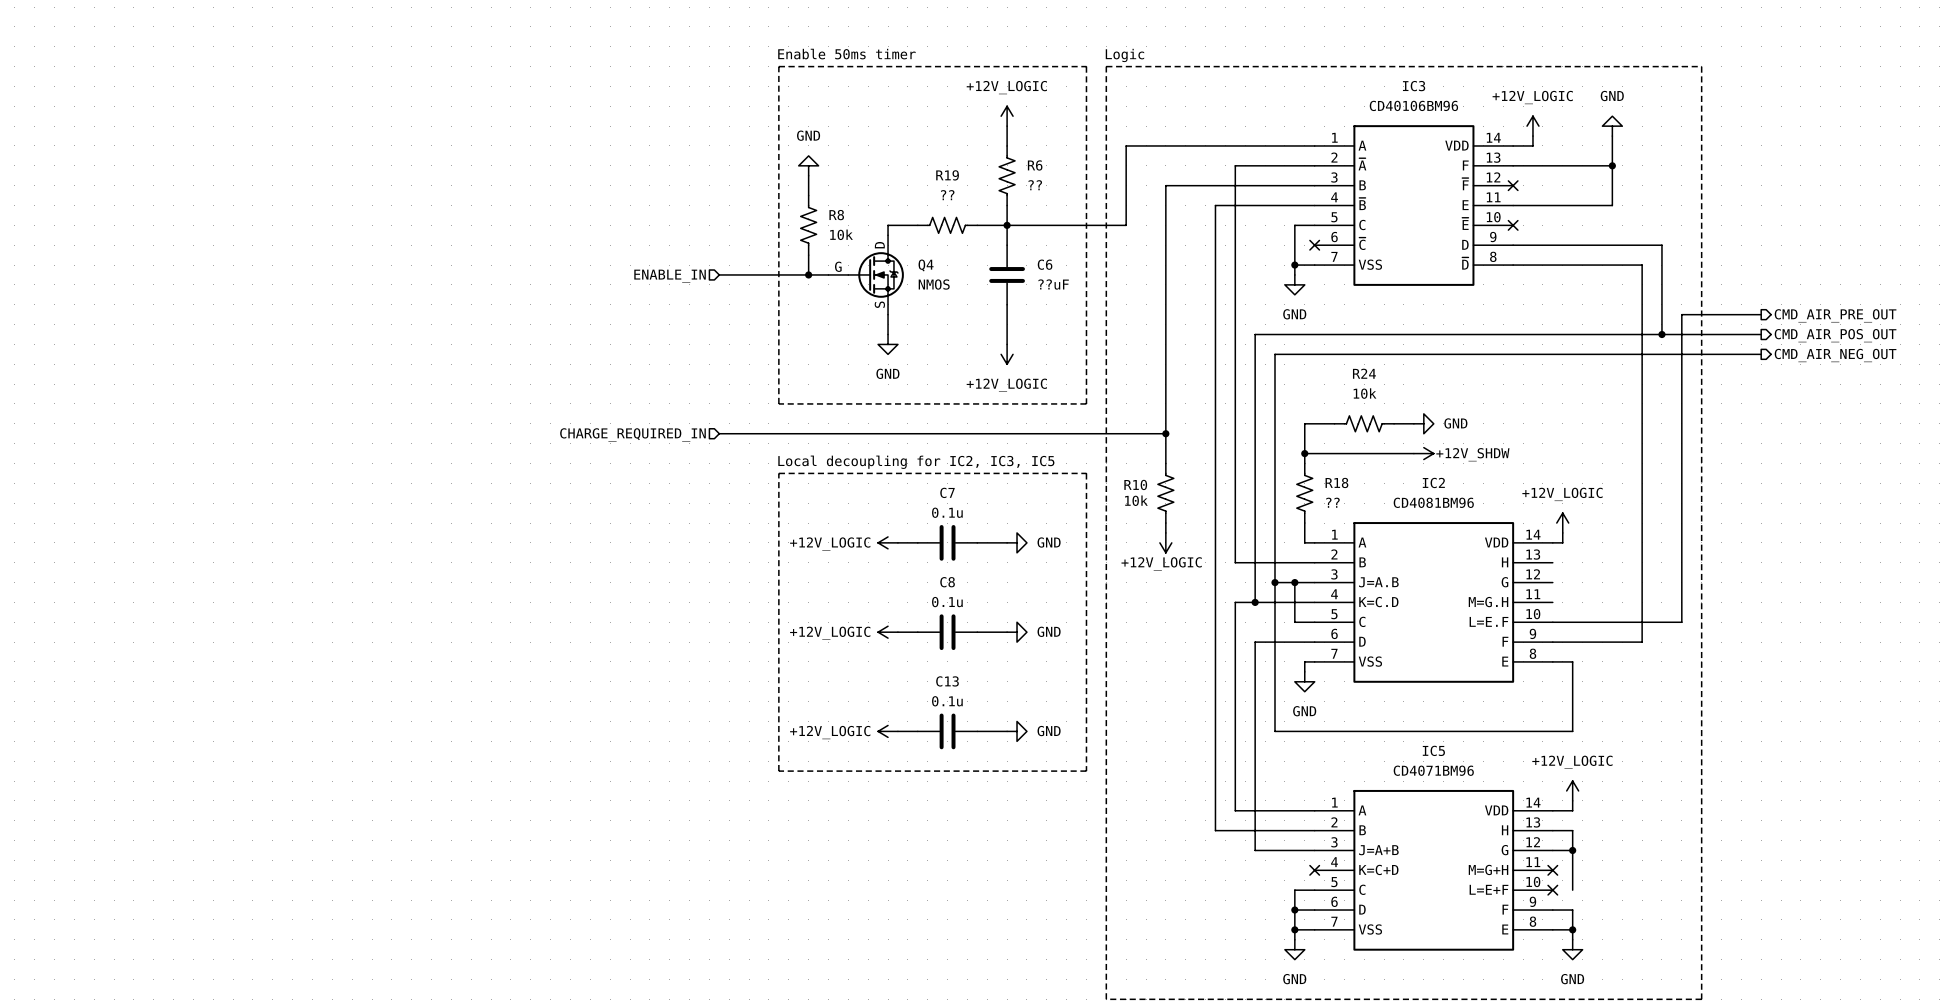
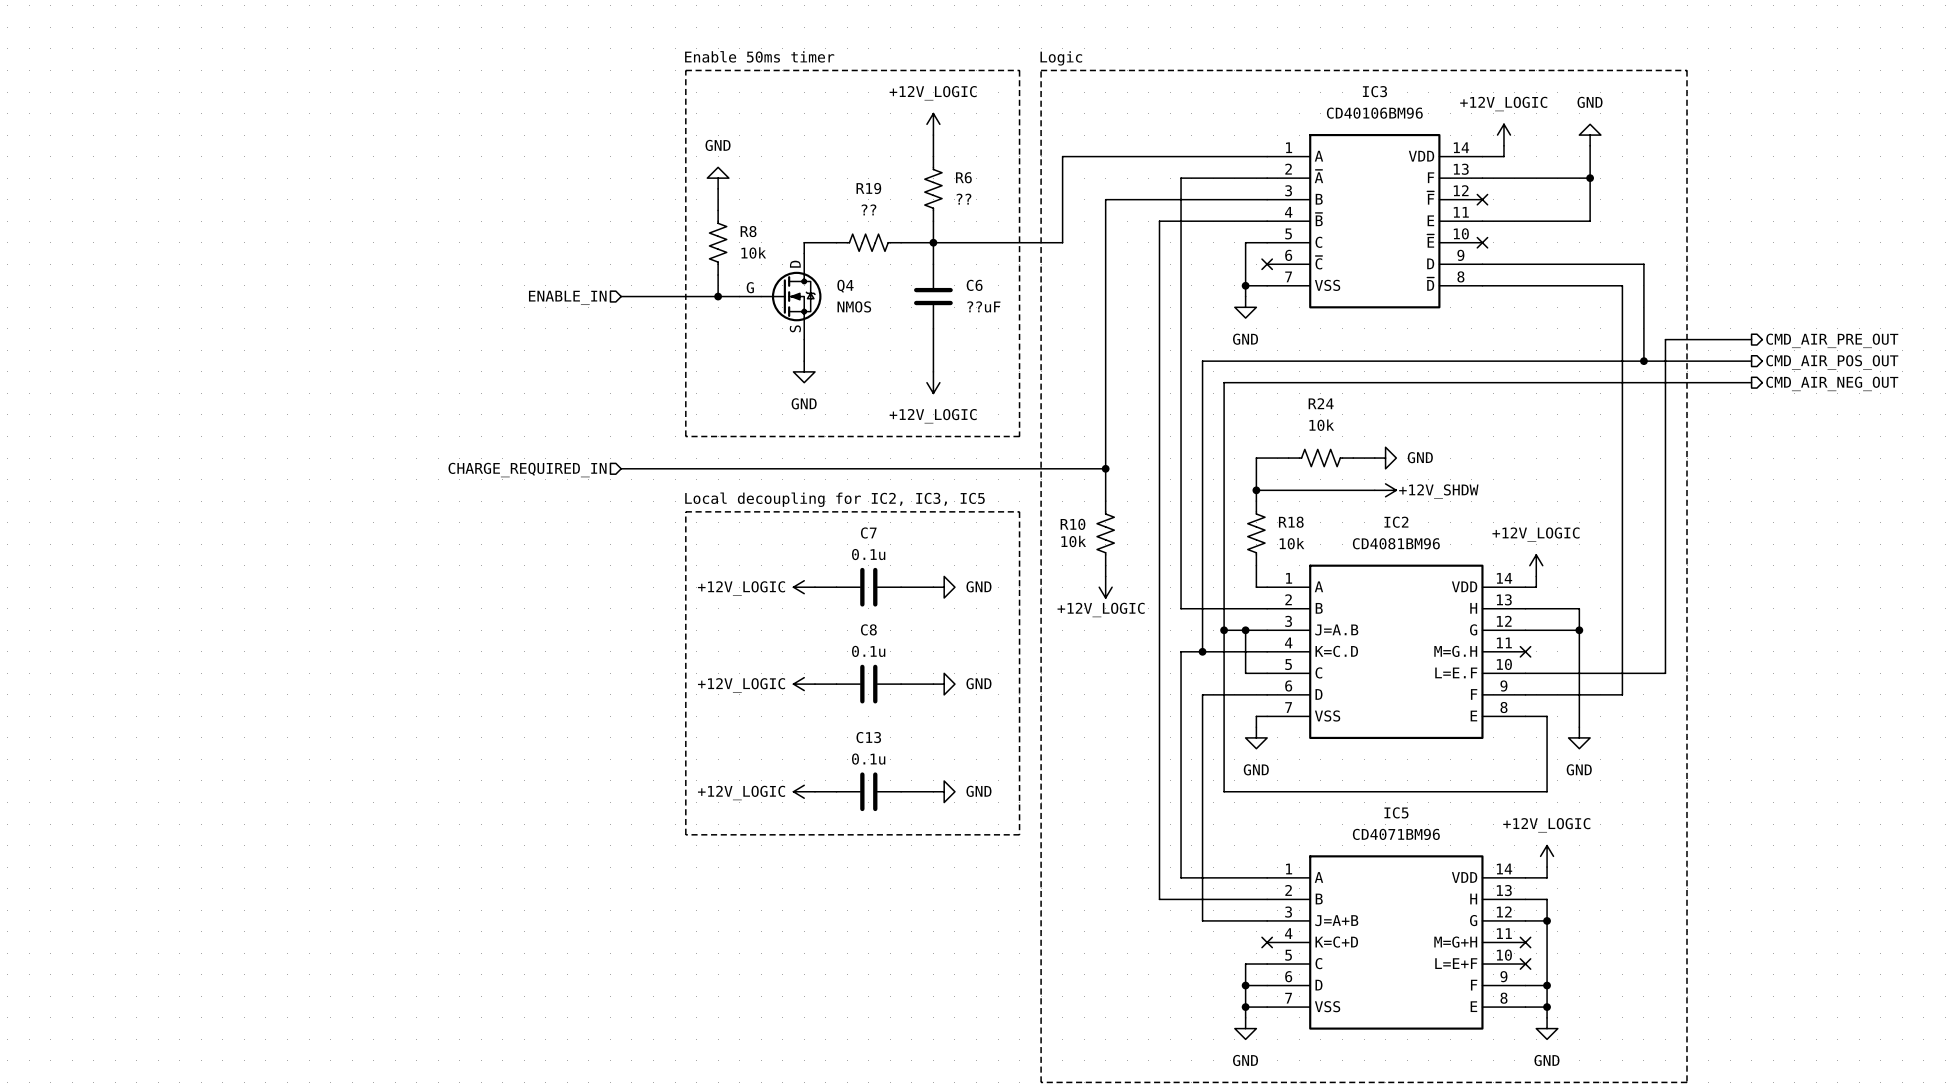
R18 value: ?? (1332, 502) -> 10k (1292, 543)
wire: none -> (1525, 608) (1579, 608) (1579, 727)
wire: none -> (1525, 630) (1579, 630)
junction: none -> (1579, 630)
no-connect mark: none -> (1525, 651)
power symbol: none -> GND (1579, 737)
wire: none -> (1547, 964) (1547, 985)
junction: none -> (1547, 985)

